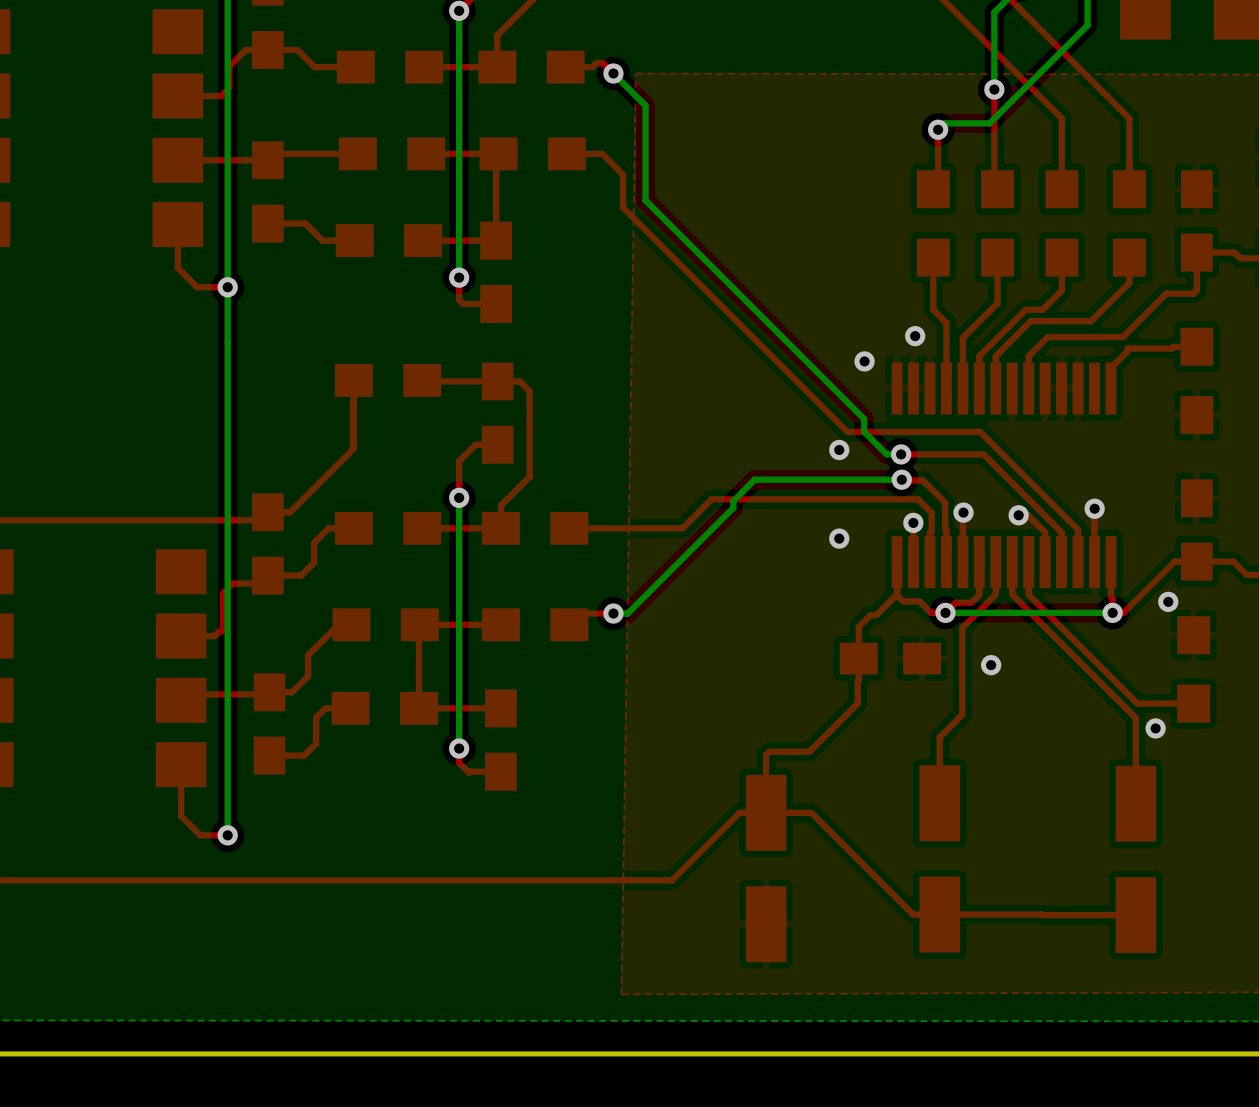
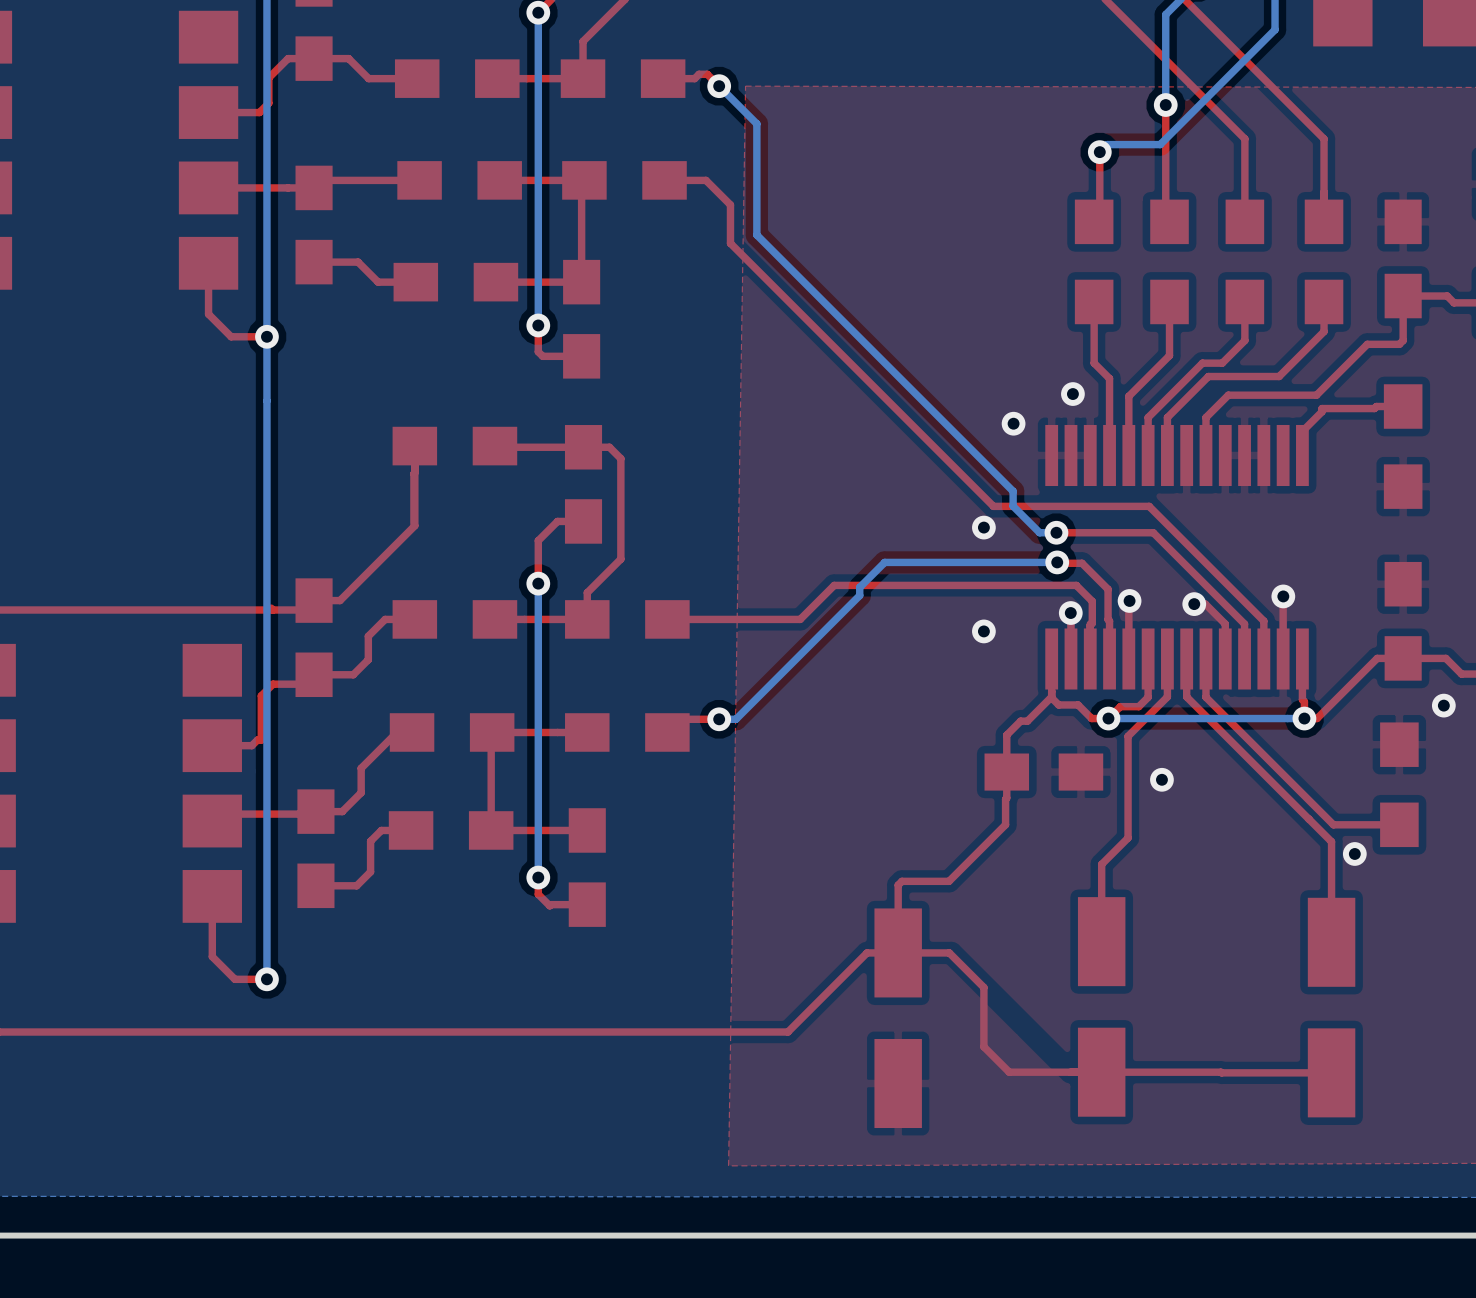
via position: (1168, 601) -> (1443, 705)
top track: (809, 812) (913, 914) -> (949, 952) (983, 987) (983, 1046) (1009, 1072) (1070, 1072)

